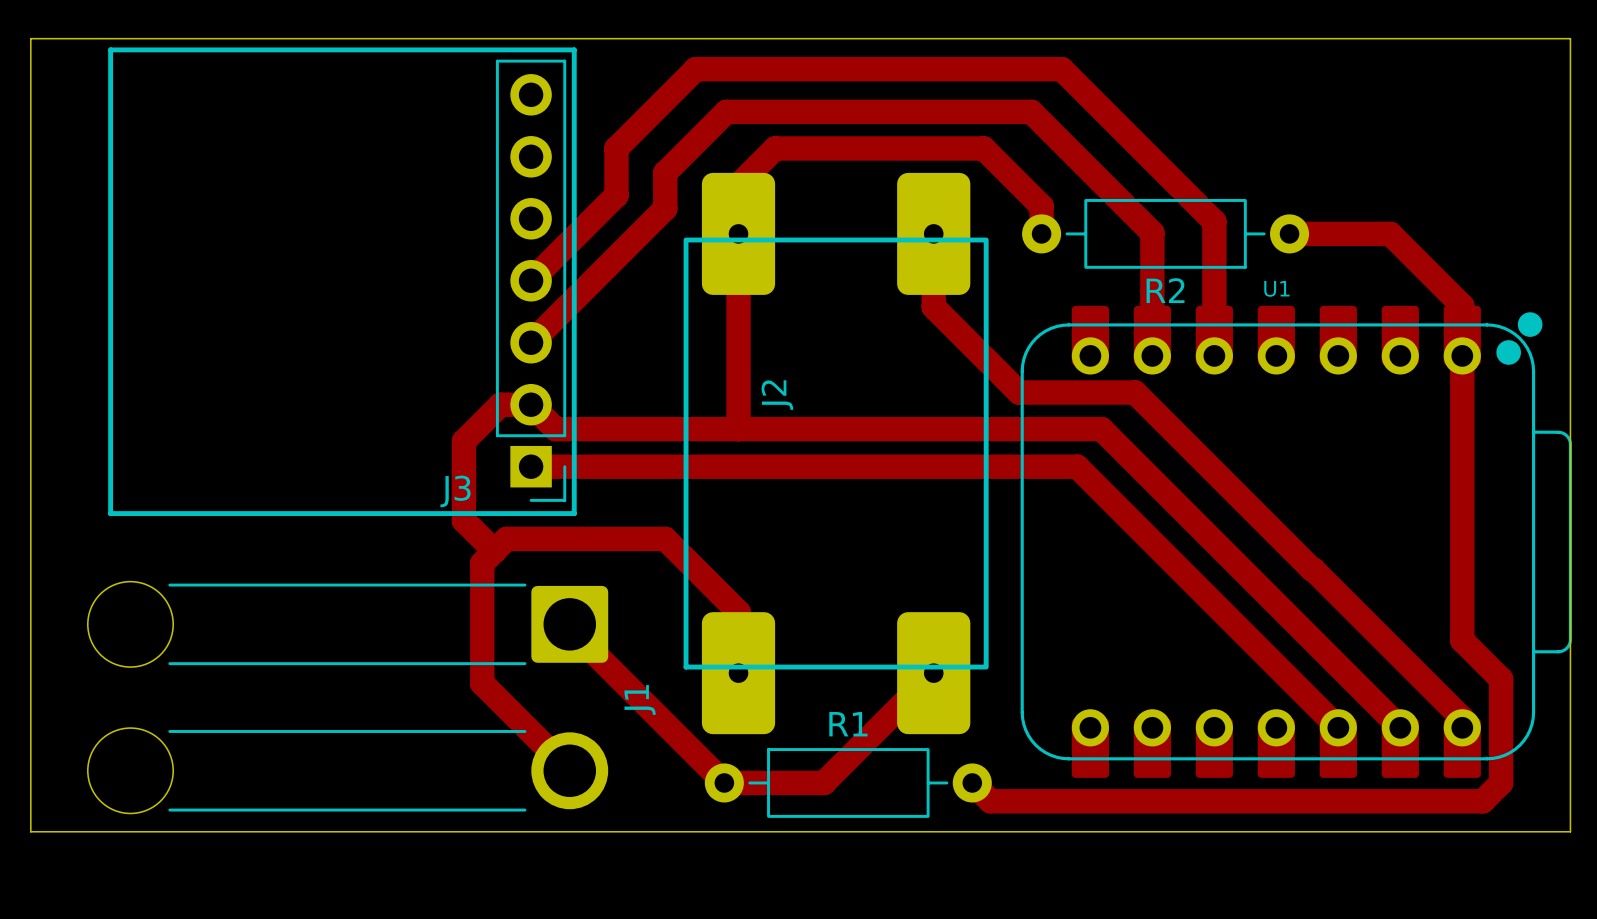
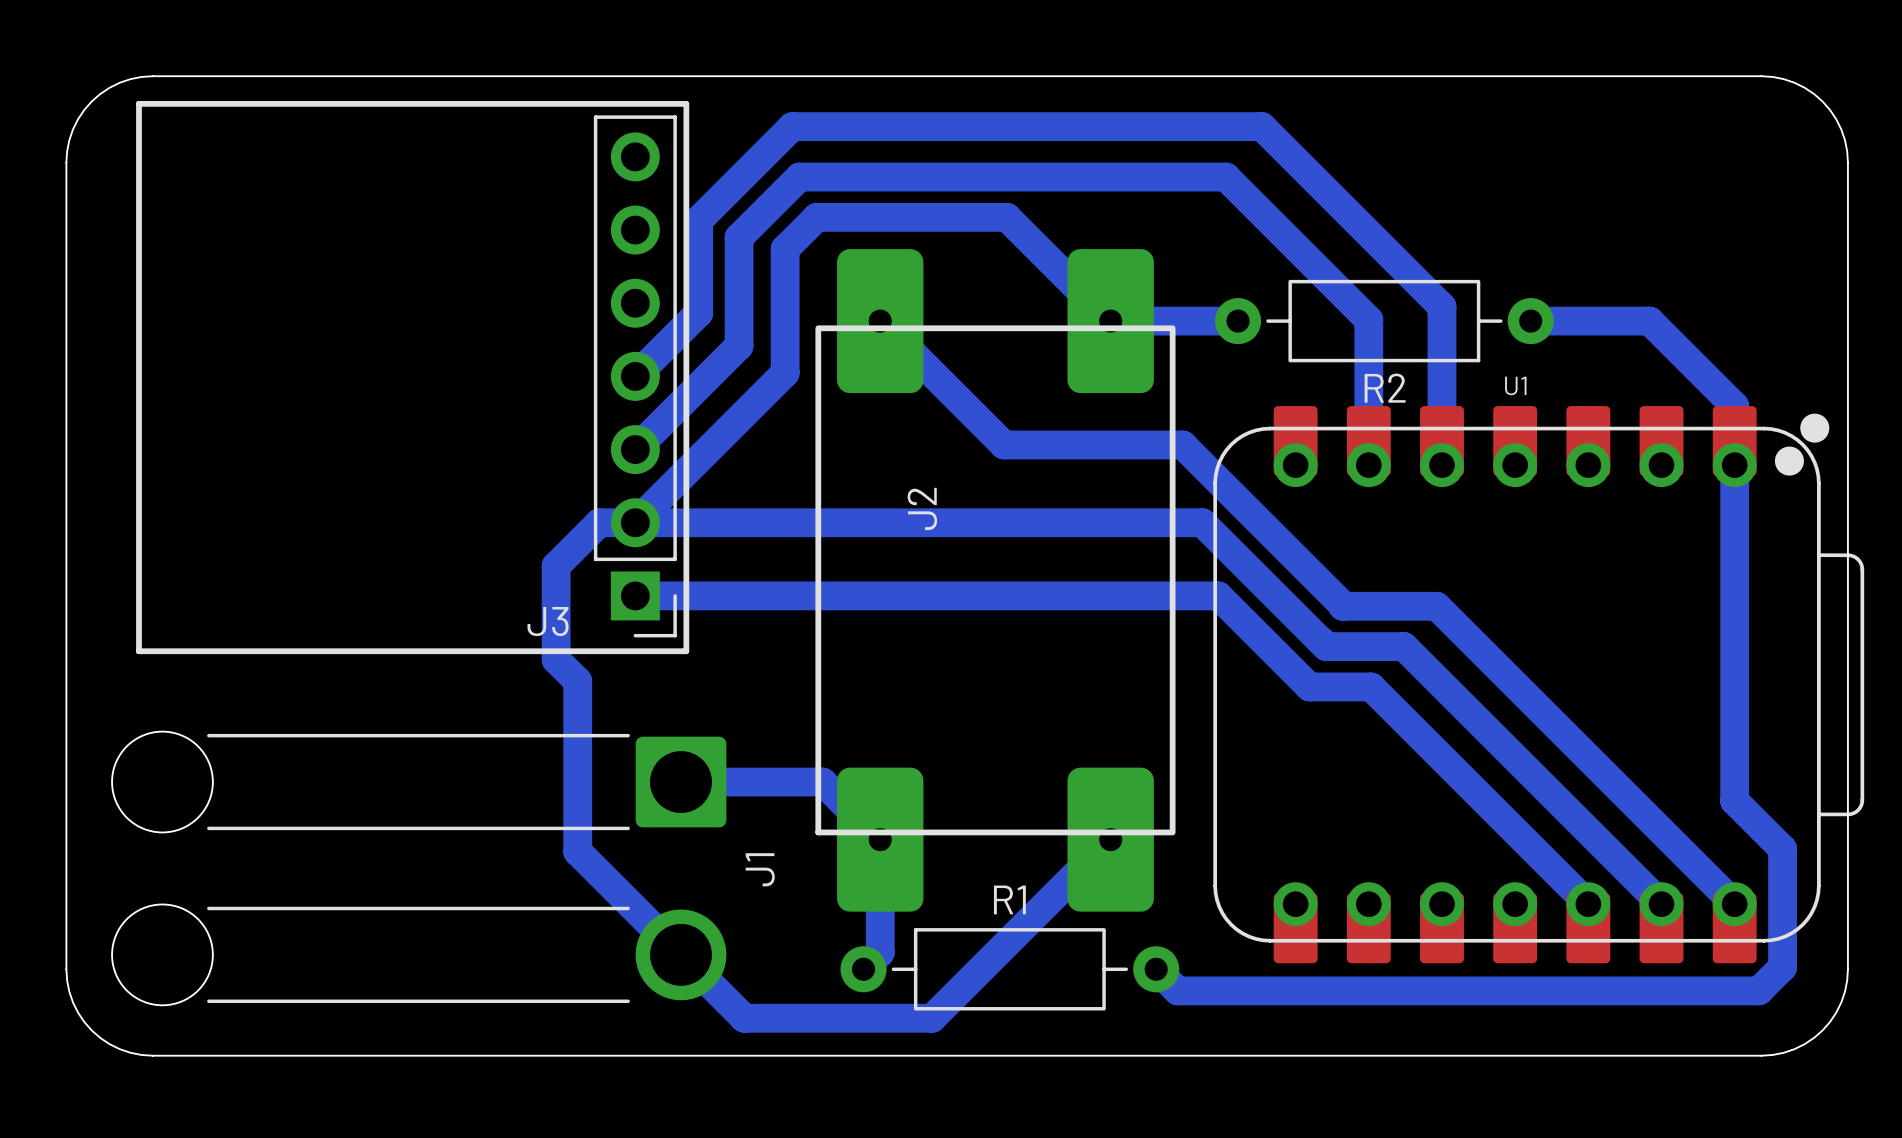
board edge: (30, 38) (1570, 38) (1570, 831) (30, 831) (30, 38) -> (152, 76) (119, 82) (91, 101) (72, 129) (66, 162) (66, 969) (69, 991) (77, 1012) (91, 1030) (109, 1044) (130, 1052) (152, 1055) (1761, 1055) (1783, 1052) (1804, 1044) (1822, 1030) (1836, 1012) (1844, 991) (1847, 969) (1847, 162) (1844, 140) (1836, 119) (1822, 101) (1804, 87) (1783, 79) (1761, 76) (152, 76)
bottom track: none -> (880, 321) (1004, 444) (1182, 444) (1342, 606) (1436, 606) (1734, 904)
top track: (933, 233) (933, 307) (1019, 392) (1135, 392) (1462, 718) (1462, 748) -> none
bottom track: none -> (1110, 321) (1006, 217) (816, 217) (785, 249) (785, 372) (635, 522)
bottom track: none -> (1151, 321) (1238, 321)
top track: (1041, 233) (1041, 206) (983, 148) (775, 148) (738, 185) (738, 429) -> none
top track: (1289, 233) (1390, 233) (1462, 305) (1462, 335) -> none
bottom track: none -> (1530, 321) (1649, 321) (1734, 406) (1734, 441)
top track: (531, 280) (616, 195) (616, 148) (695, 69) (1061, 69) (1214, 221) (1214, 335) -> none
bottom track: none -> (635, 376) (698, 313) (698, 220) (792, 126) (1261, 126) (1441, 306) (1441, 441)
top track: (1152, 335) (1152, 232) (1031, 111) (726, 111) (665, 172) (665, 208) (531, 342) -> none
bottom track: none -> (1368, 441) (1368, 319) (1225, 177) (799, 177) (739, 237) (739, 345) (635, 449)
top track: (1462, 355) (1462, 640) (1501, 679) (1501, 782) (1482, 801) (990, 801) (972, 782) -> none
bottom track: none -> (1734, 465) (1734, 801) (1782, 848) (1782, 967) (1758, 990) (1177, 990) (1156, 969)
top track: (531, 466) (1077, 466) (1338, 727) -> none
bottom track: none -> (635, 595) (1218, 595) (1309, 686) (1371, 686) (1588, 904)
bottom track: none -> (1321, 640) (1326, 646) (1403, 646) (1661, 904)
bottom track: none -> (1326, 646) (1202, 522) (599, 522) (556, 565) (556, 659) (577, 681) (577, 851) (744, 1018) (932, 1018) (1110, 839)
top track: (494, 551) (463, 520) (463, 441) (500, 404) (531, 404) (555, 429) (1101, 429) (1400, 727) -> none
top track: (569, 624) (569, 628) (724, 782) (823, 782) (933, 673) -> none
bottom track: none -> (681, 786) (681, 782) (822, 782) (880, 839) (880, 952) (863, 969)
top track: (738, 673) (738, 612) (665, 538) (506, 538) (482, 563) (482, 683) (569, 770) -> none

